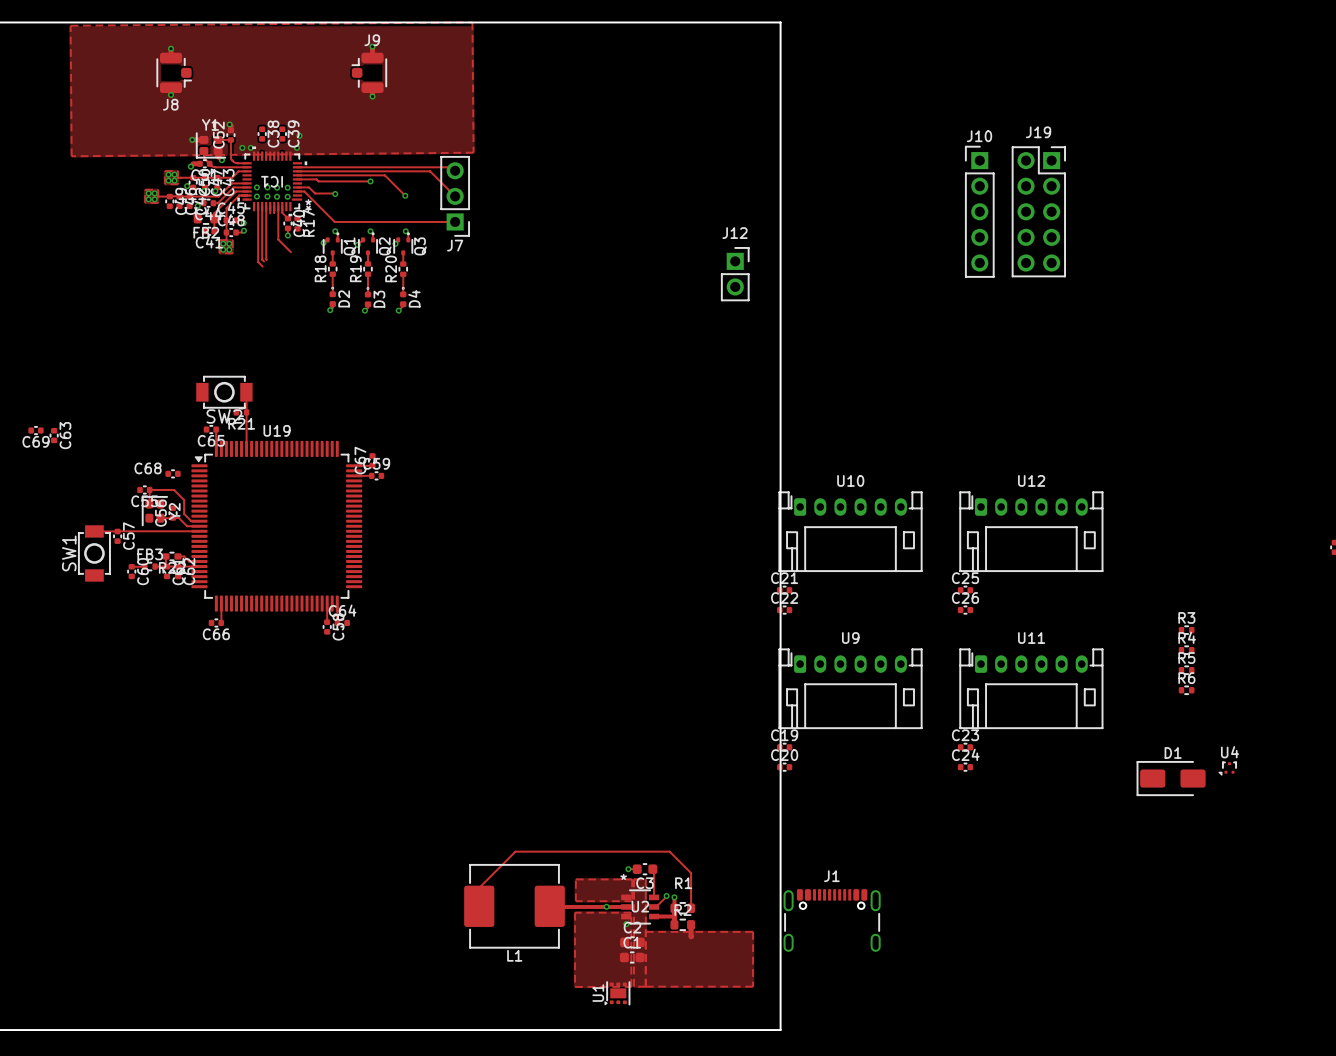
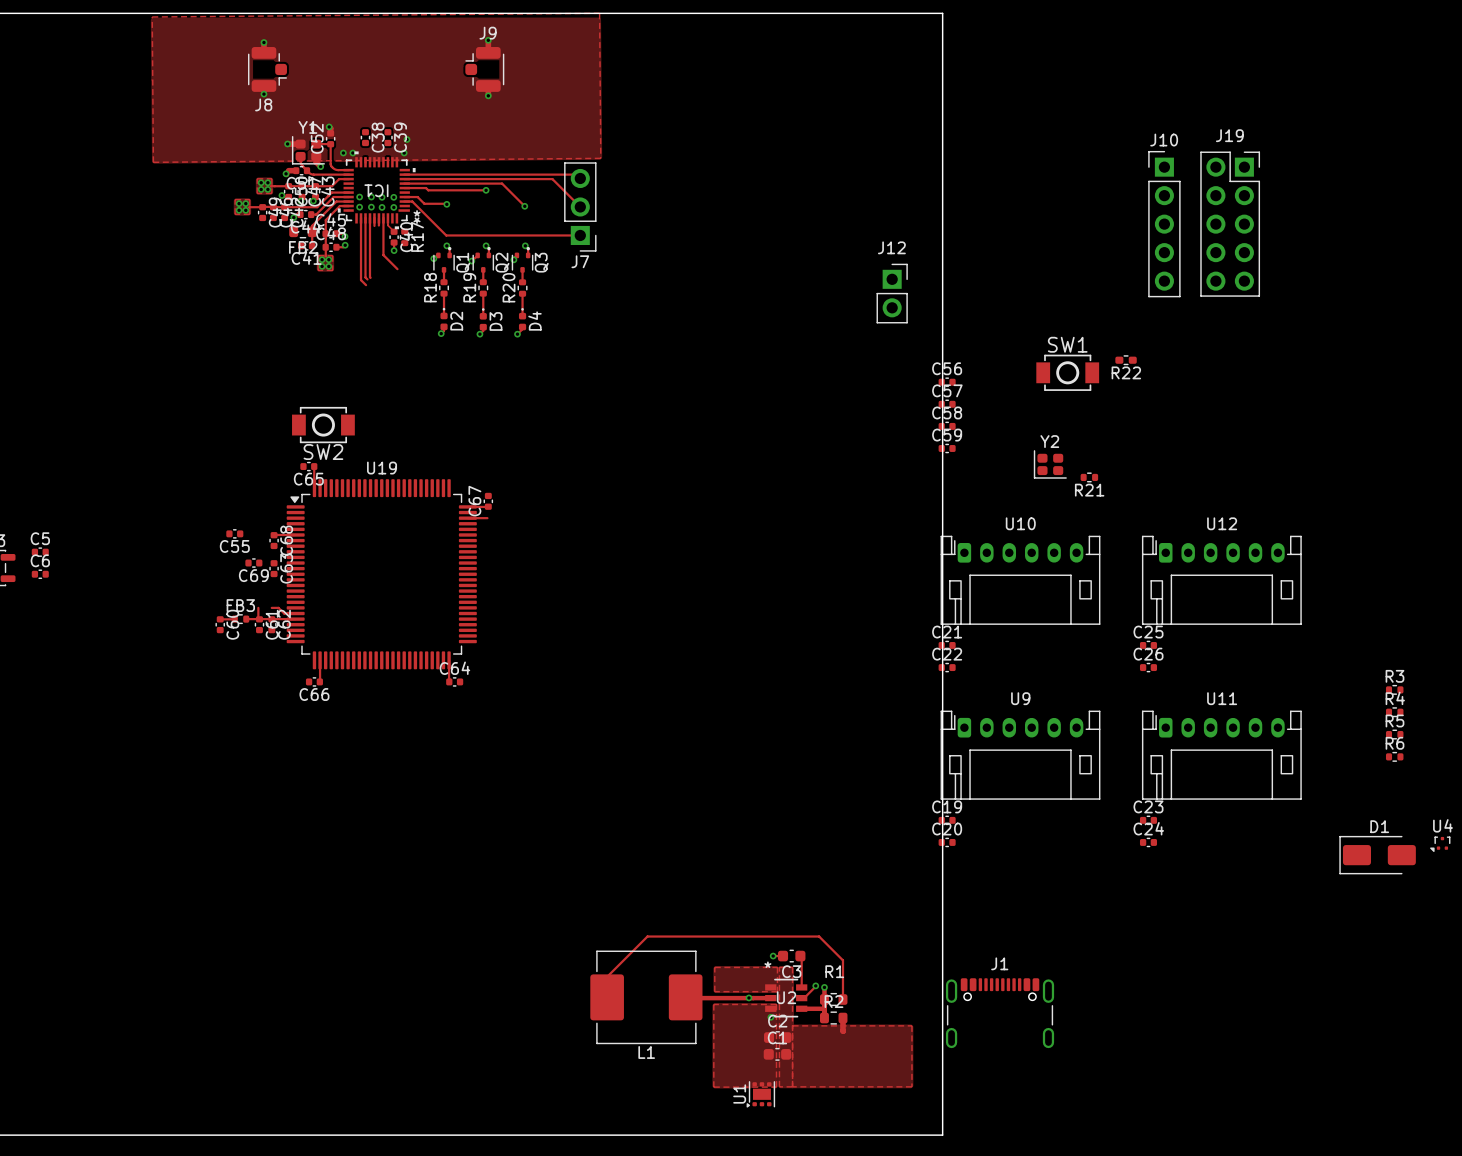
track: (246, 392) (246, 448) -> none
R21 position: (241, 412) -> (1089, 477)
C69 position: (36, 430) -> (253, 563)
C63 position: (54, 435) -> (274, 568)
C68 name position: C68 (148, 468) -> C68 (286, 540)
C68 rotation: 0° (173, 473) -> 90° clockwise (274, 540)
C68 position: (173, 473) -> (274, 540)
C59 position: (376, 475) -> (947, 448)
track: none -> (274, 534) (295, 534)
track: (149, 504) (149, 489) (174, 489) (184, 500) (184, 513) (191, 521) (199, 521) -> none
Y2 rotation: 0° (154, 511) -> 90° counterclockwise (1050, 464)
Y2 position: (154, 511) -> (1050, 464)
C56 rotation: 0° (173, 513) -> 90° clockwise (947, 382)
C56 position: (173, 513) -> (947, 382)
track: (160, 518) (178, 517) (187, 526) (199, 526) -> none
track: (94, 531) (117, 531) -> none
track: (199, 531) (117, 531) -> none
C57 rotation: 0° (117, 536) -> 90° clockwise (947, 404)
C57 position: (117, 536) -> (947, 404)
SW1 rotation: 0° (94, 553) -> 90° clockwise (1067, 372)
SW1 position: (94, 553) -> (1067, 372)
R22 position: (171, 556) -> (1126, 360)
track: (327, 603) (327, 622) -> none
C58 rotation: 0° (327, 627) -> 90° clockwise (947, 426)
C58 position: (327, 627) -> (947, 426)

